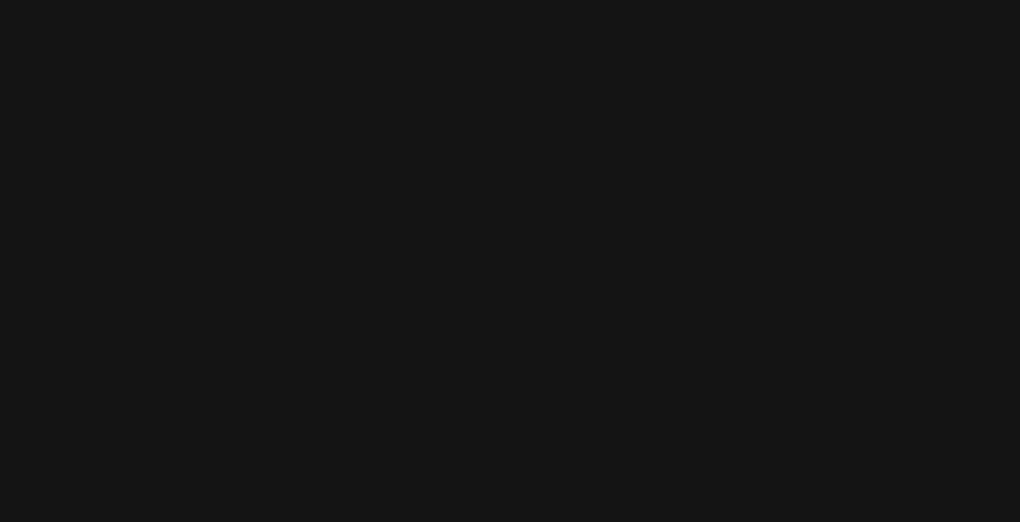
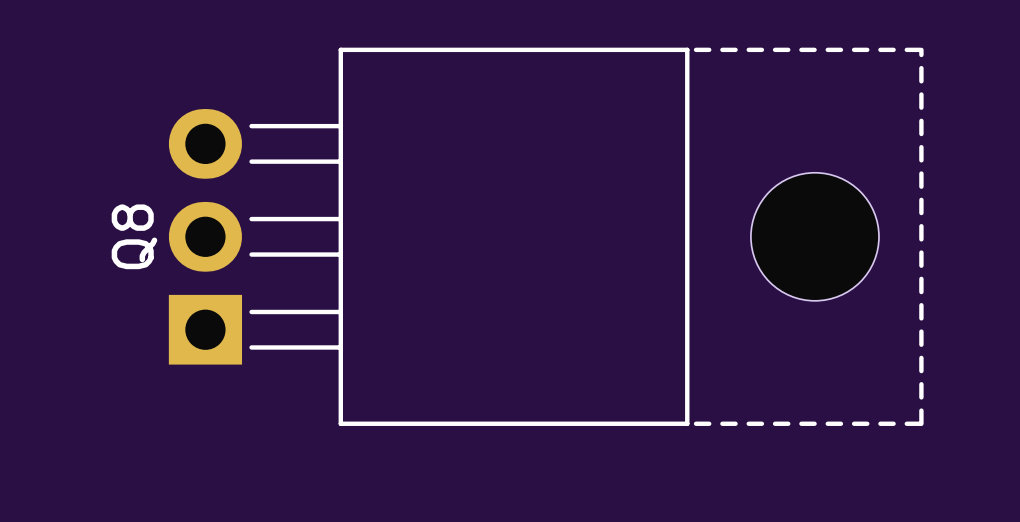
Q8: none -> (546, 236)

